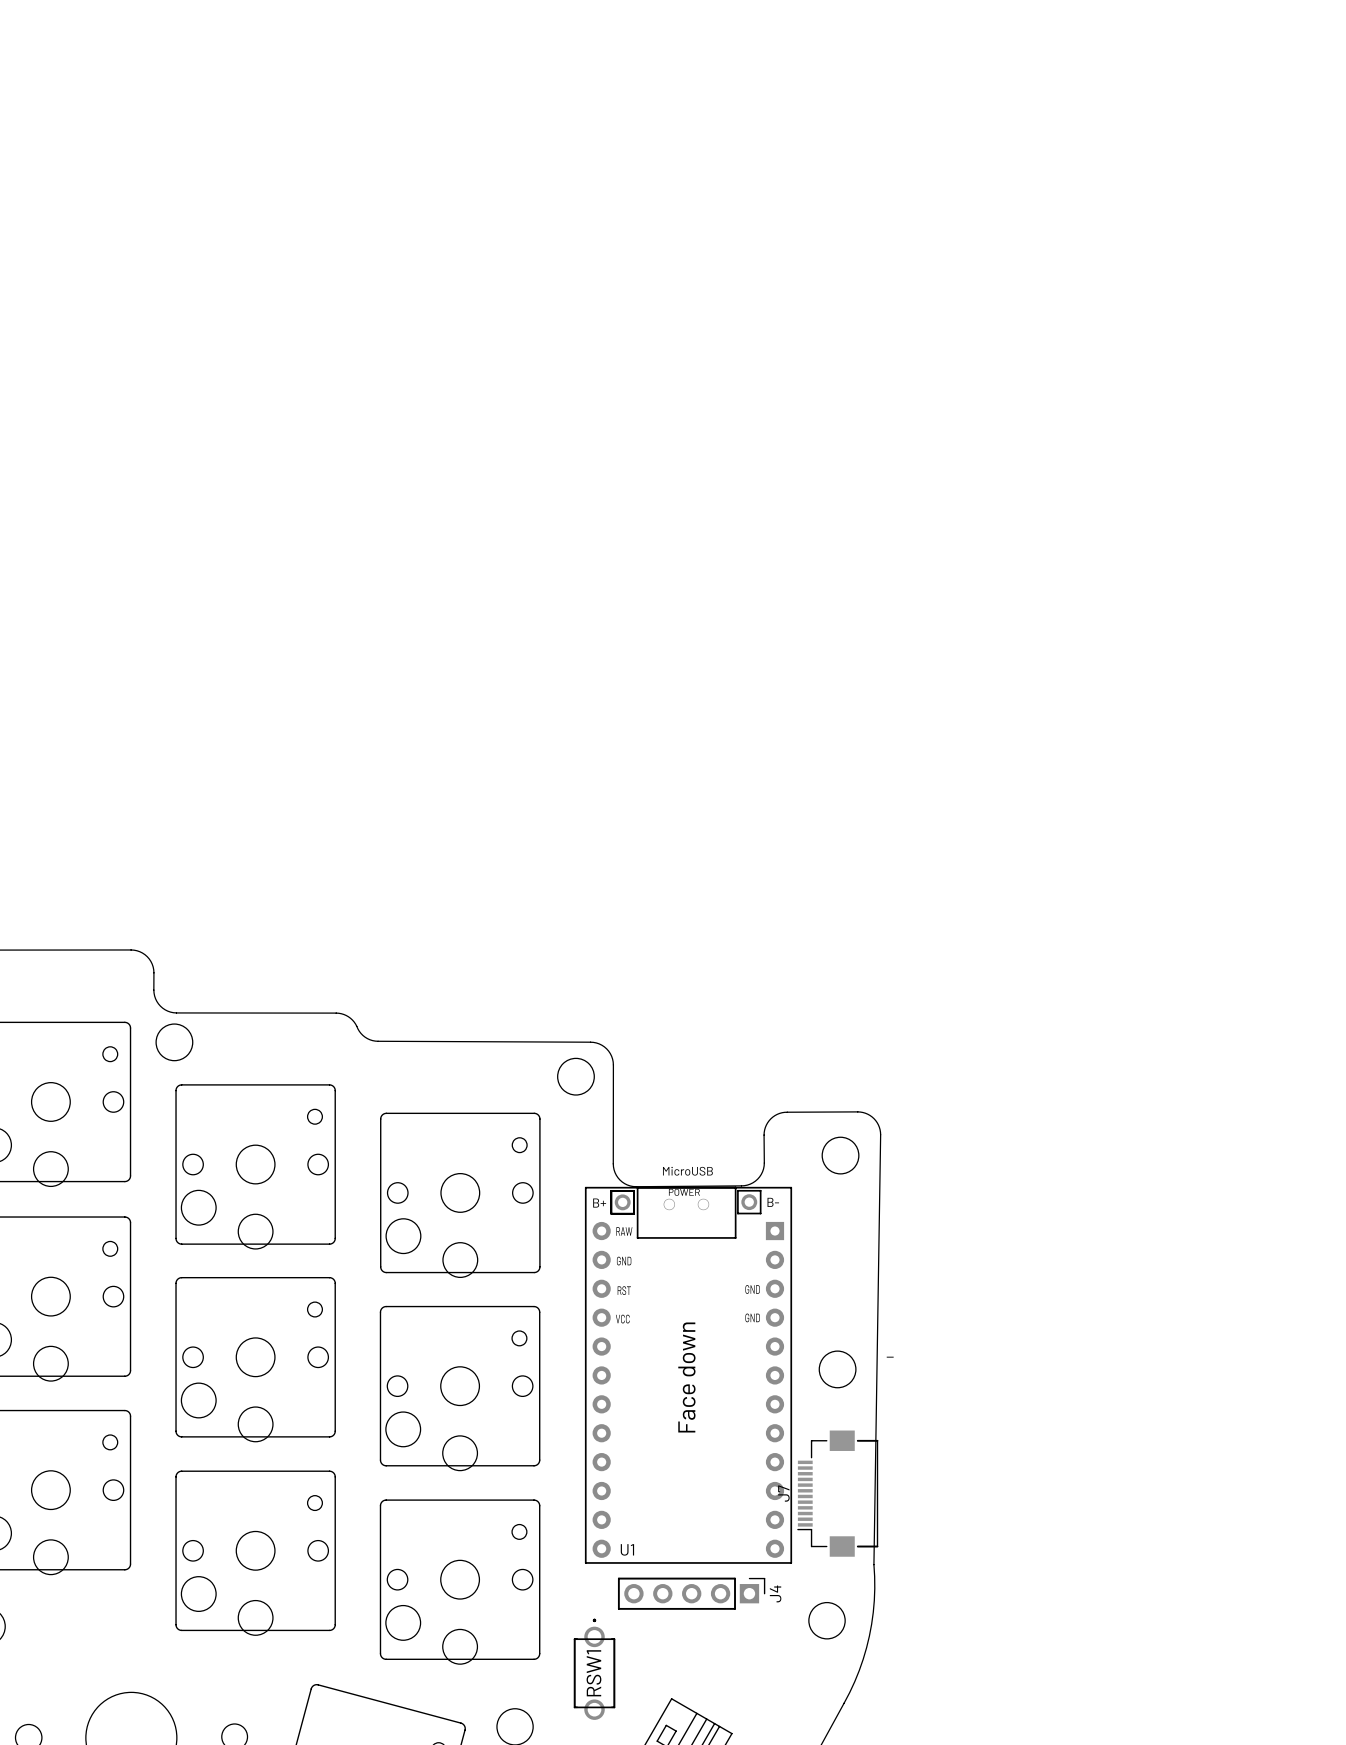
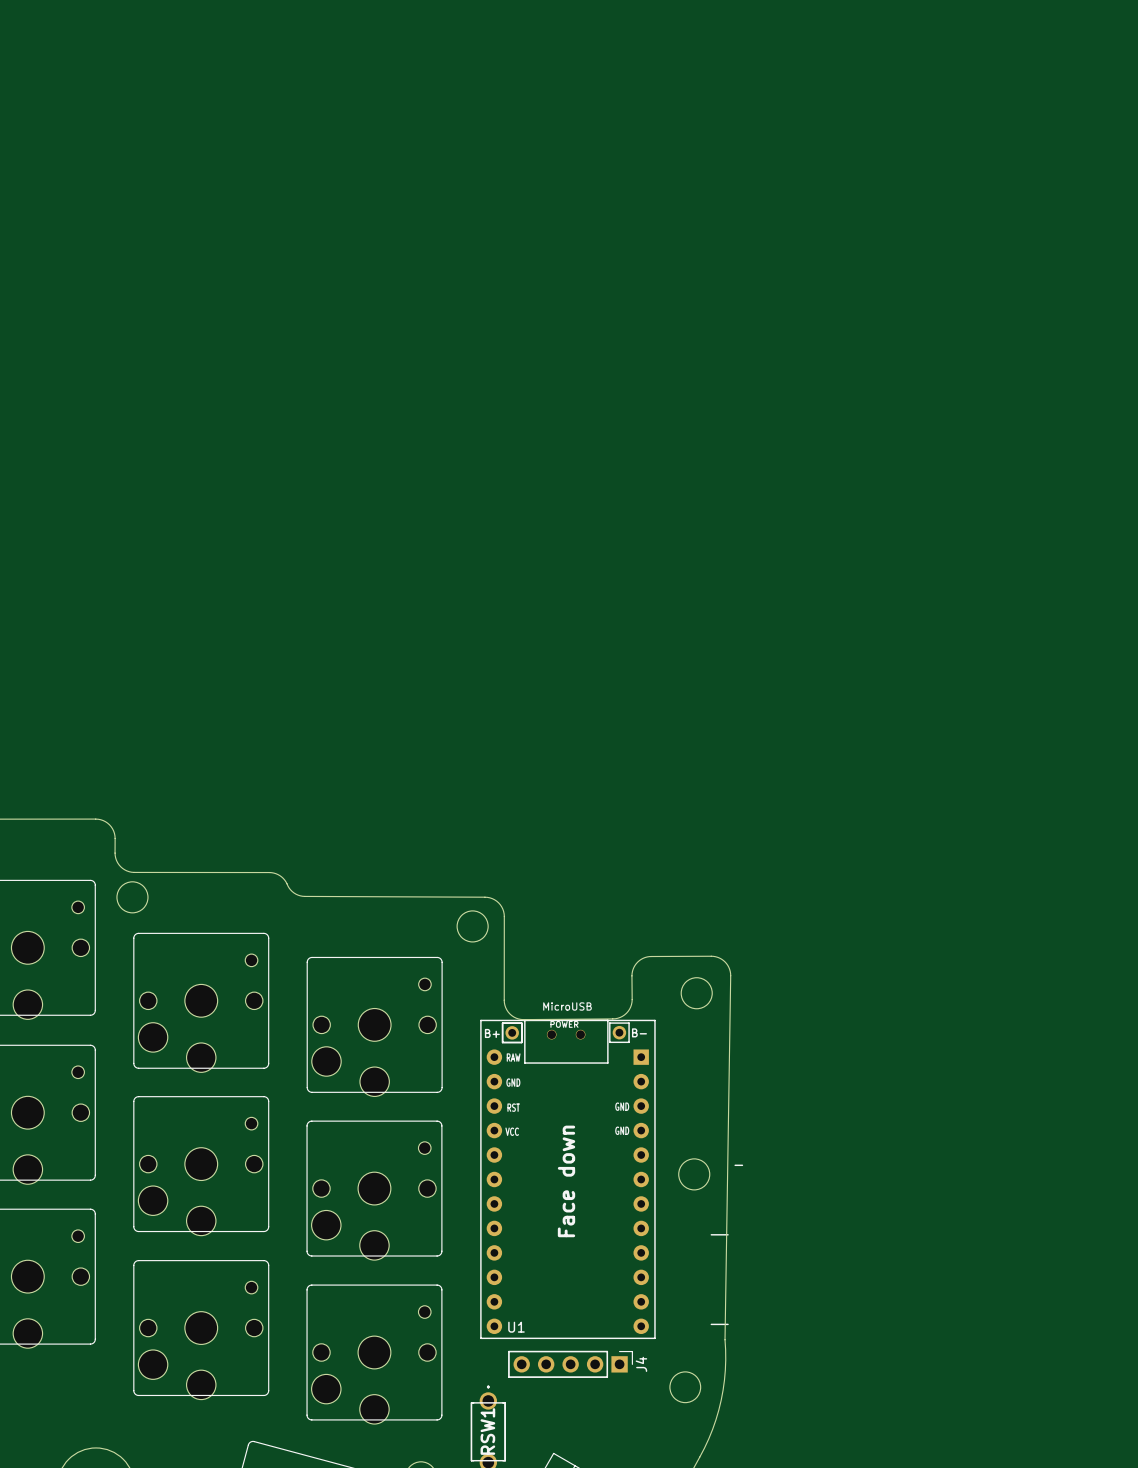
J7: (837, 1493) -> none

